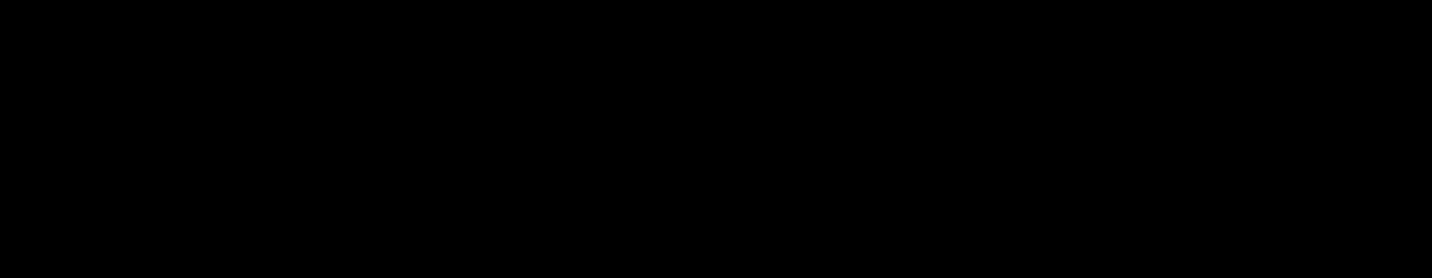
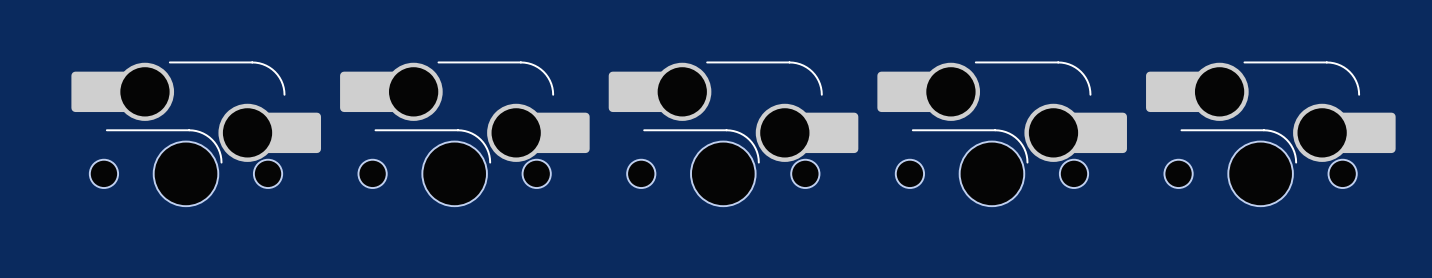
part: none -> (196, 133)
part: none -> (464, 133)
part: none -> (733, 133)
part: none -> (1002, 133)
part: none -> (1270, 133)

